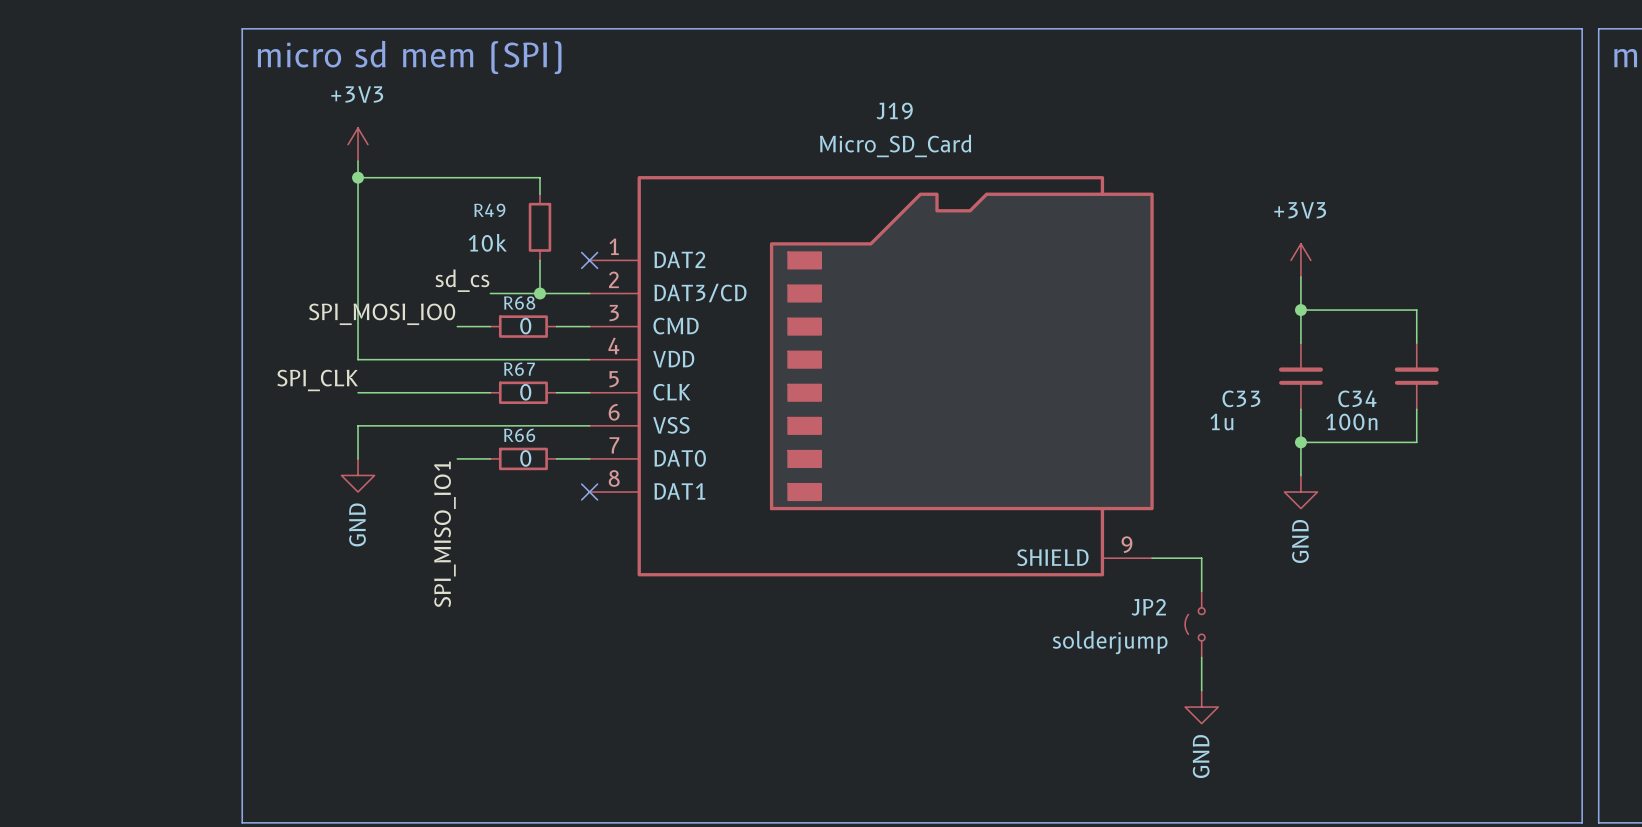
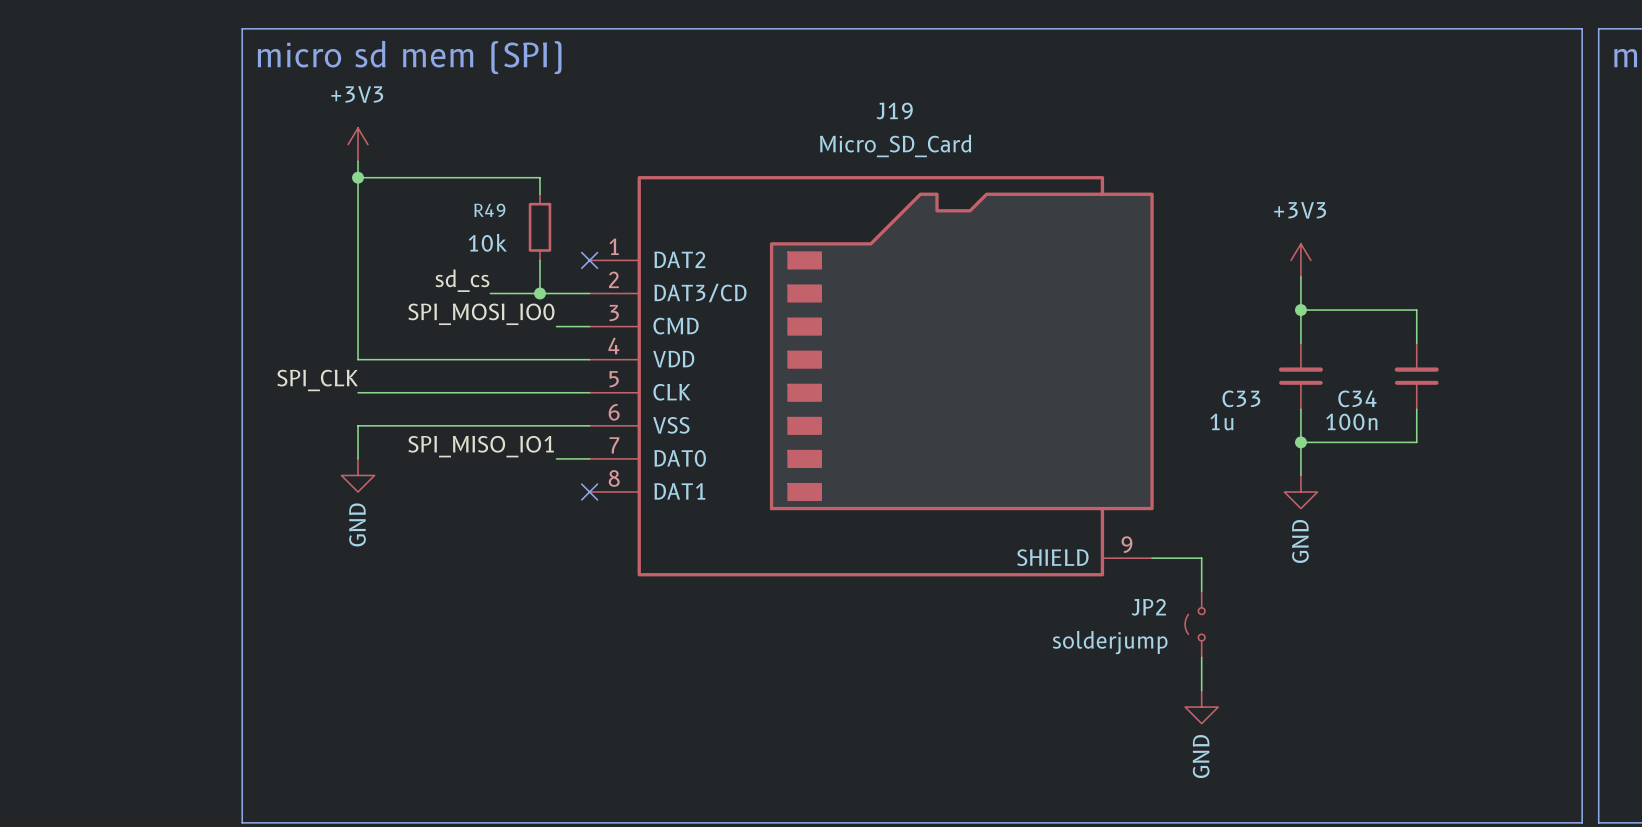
label position: SPI_MOSI_IO0 (382, 314) -> SPI_MOSI_IO0 (481, 314)
wire: (457, 326) (490, 326) -> none
R68: 0 (523, 326) -> none
wire: none -> (490, 392) (556, 392)
R67: 0 (523, 392) -> none
wire: (457, 458) (490, 458) -> none
R66: 0 (523, 458) -> none
label rotation: 0° (444, 534) -> 90° clockwise (481, 446)

